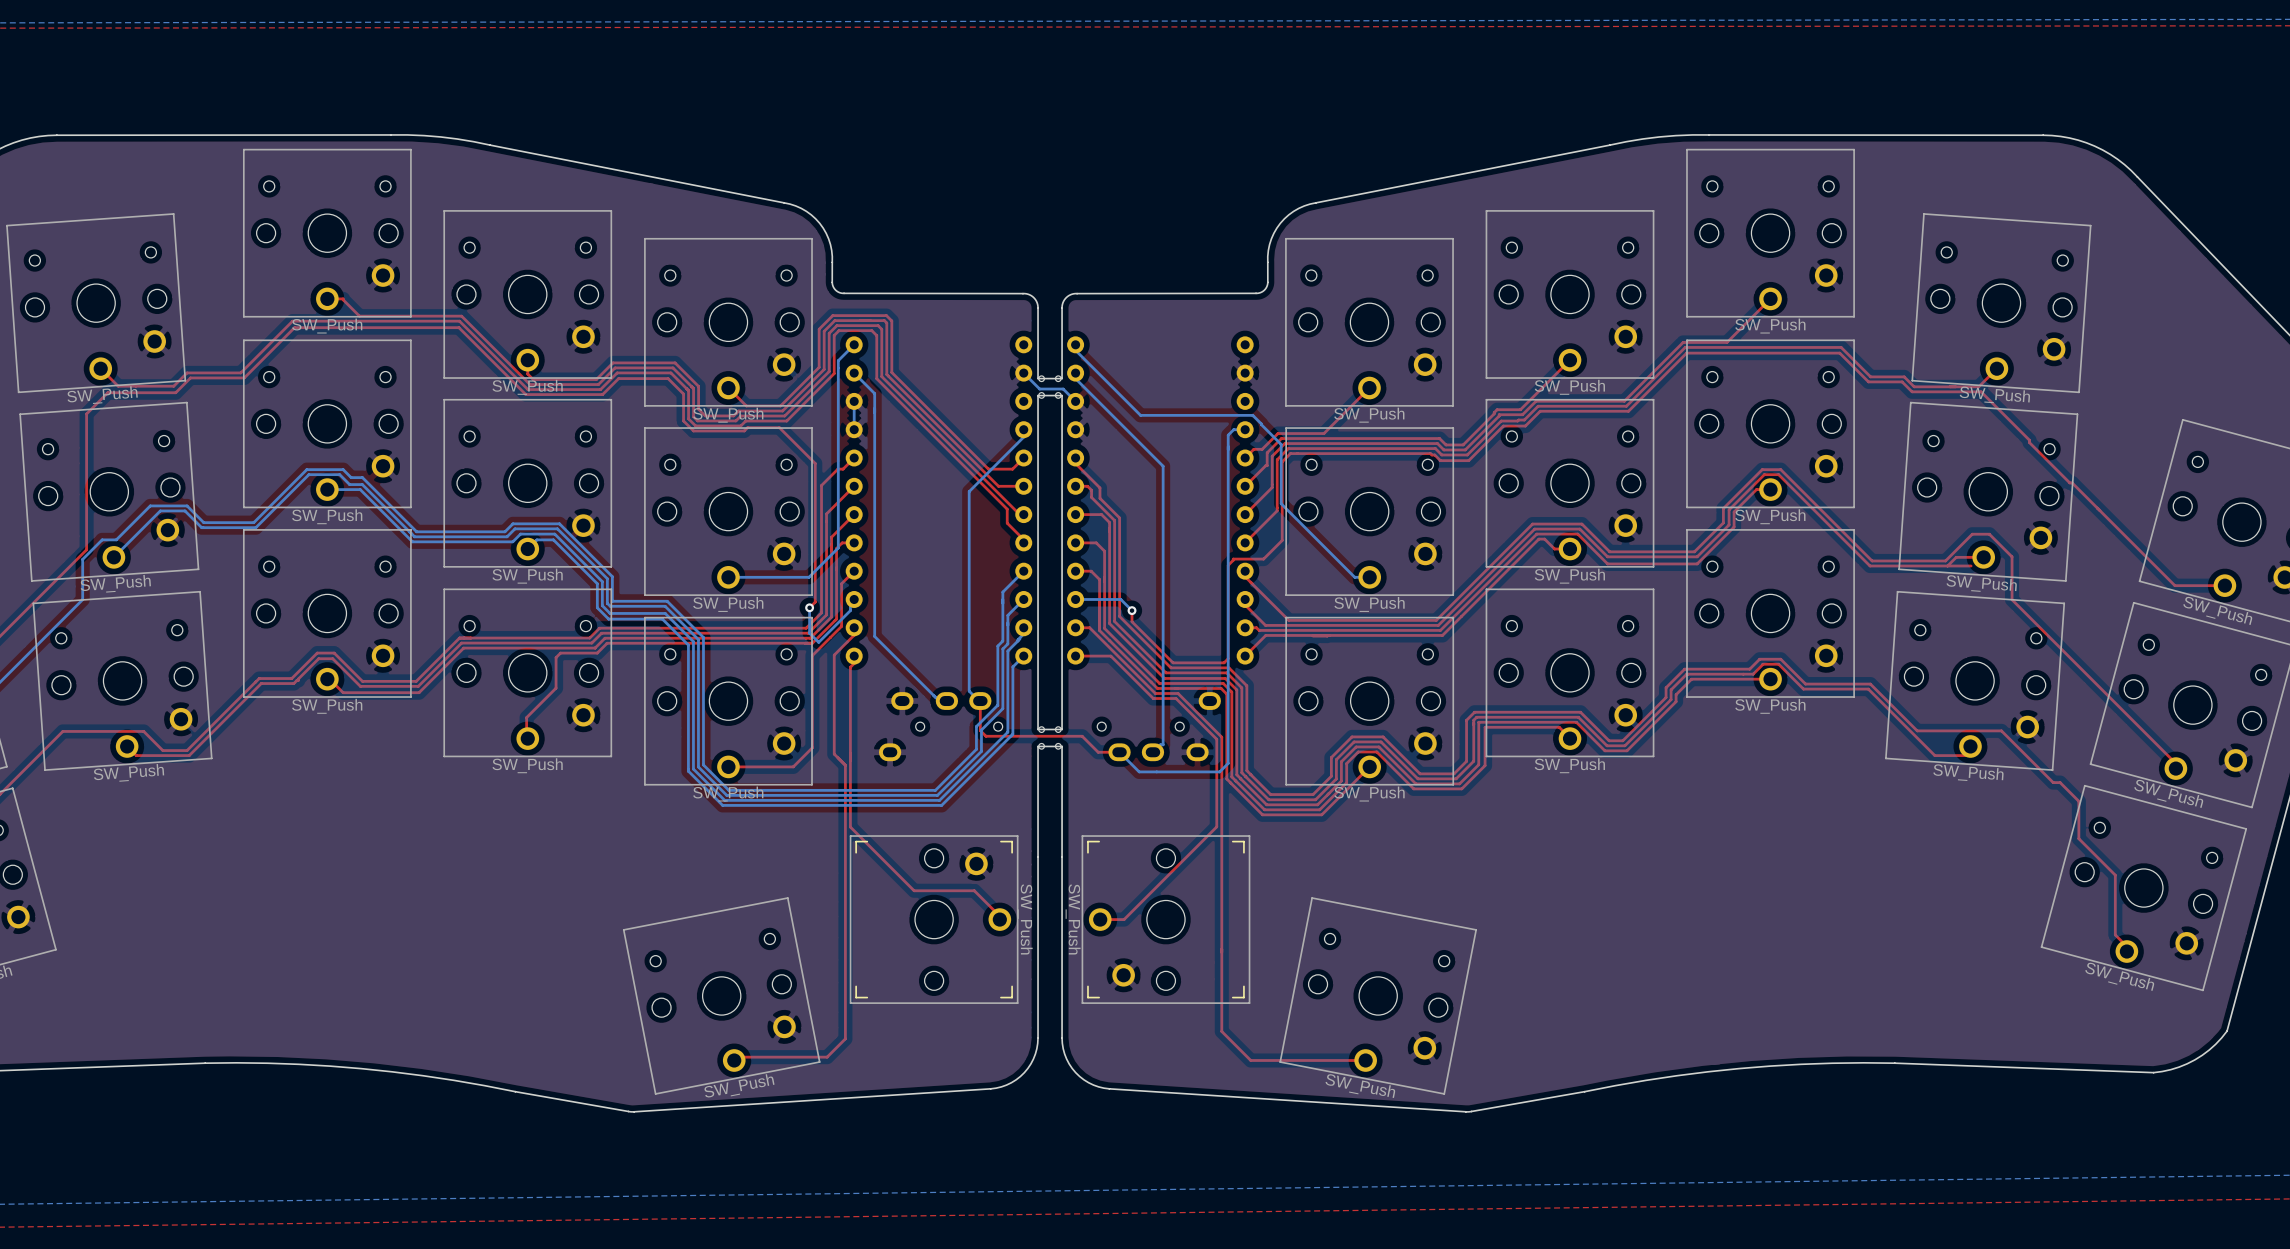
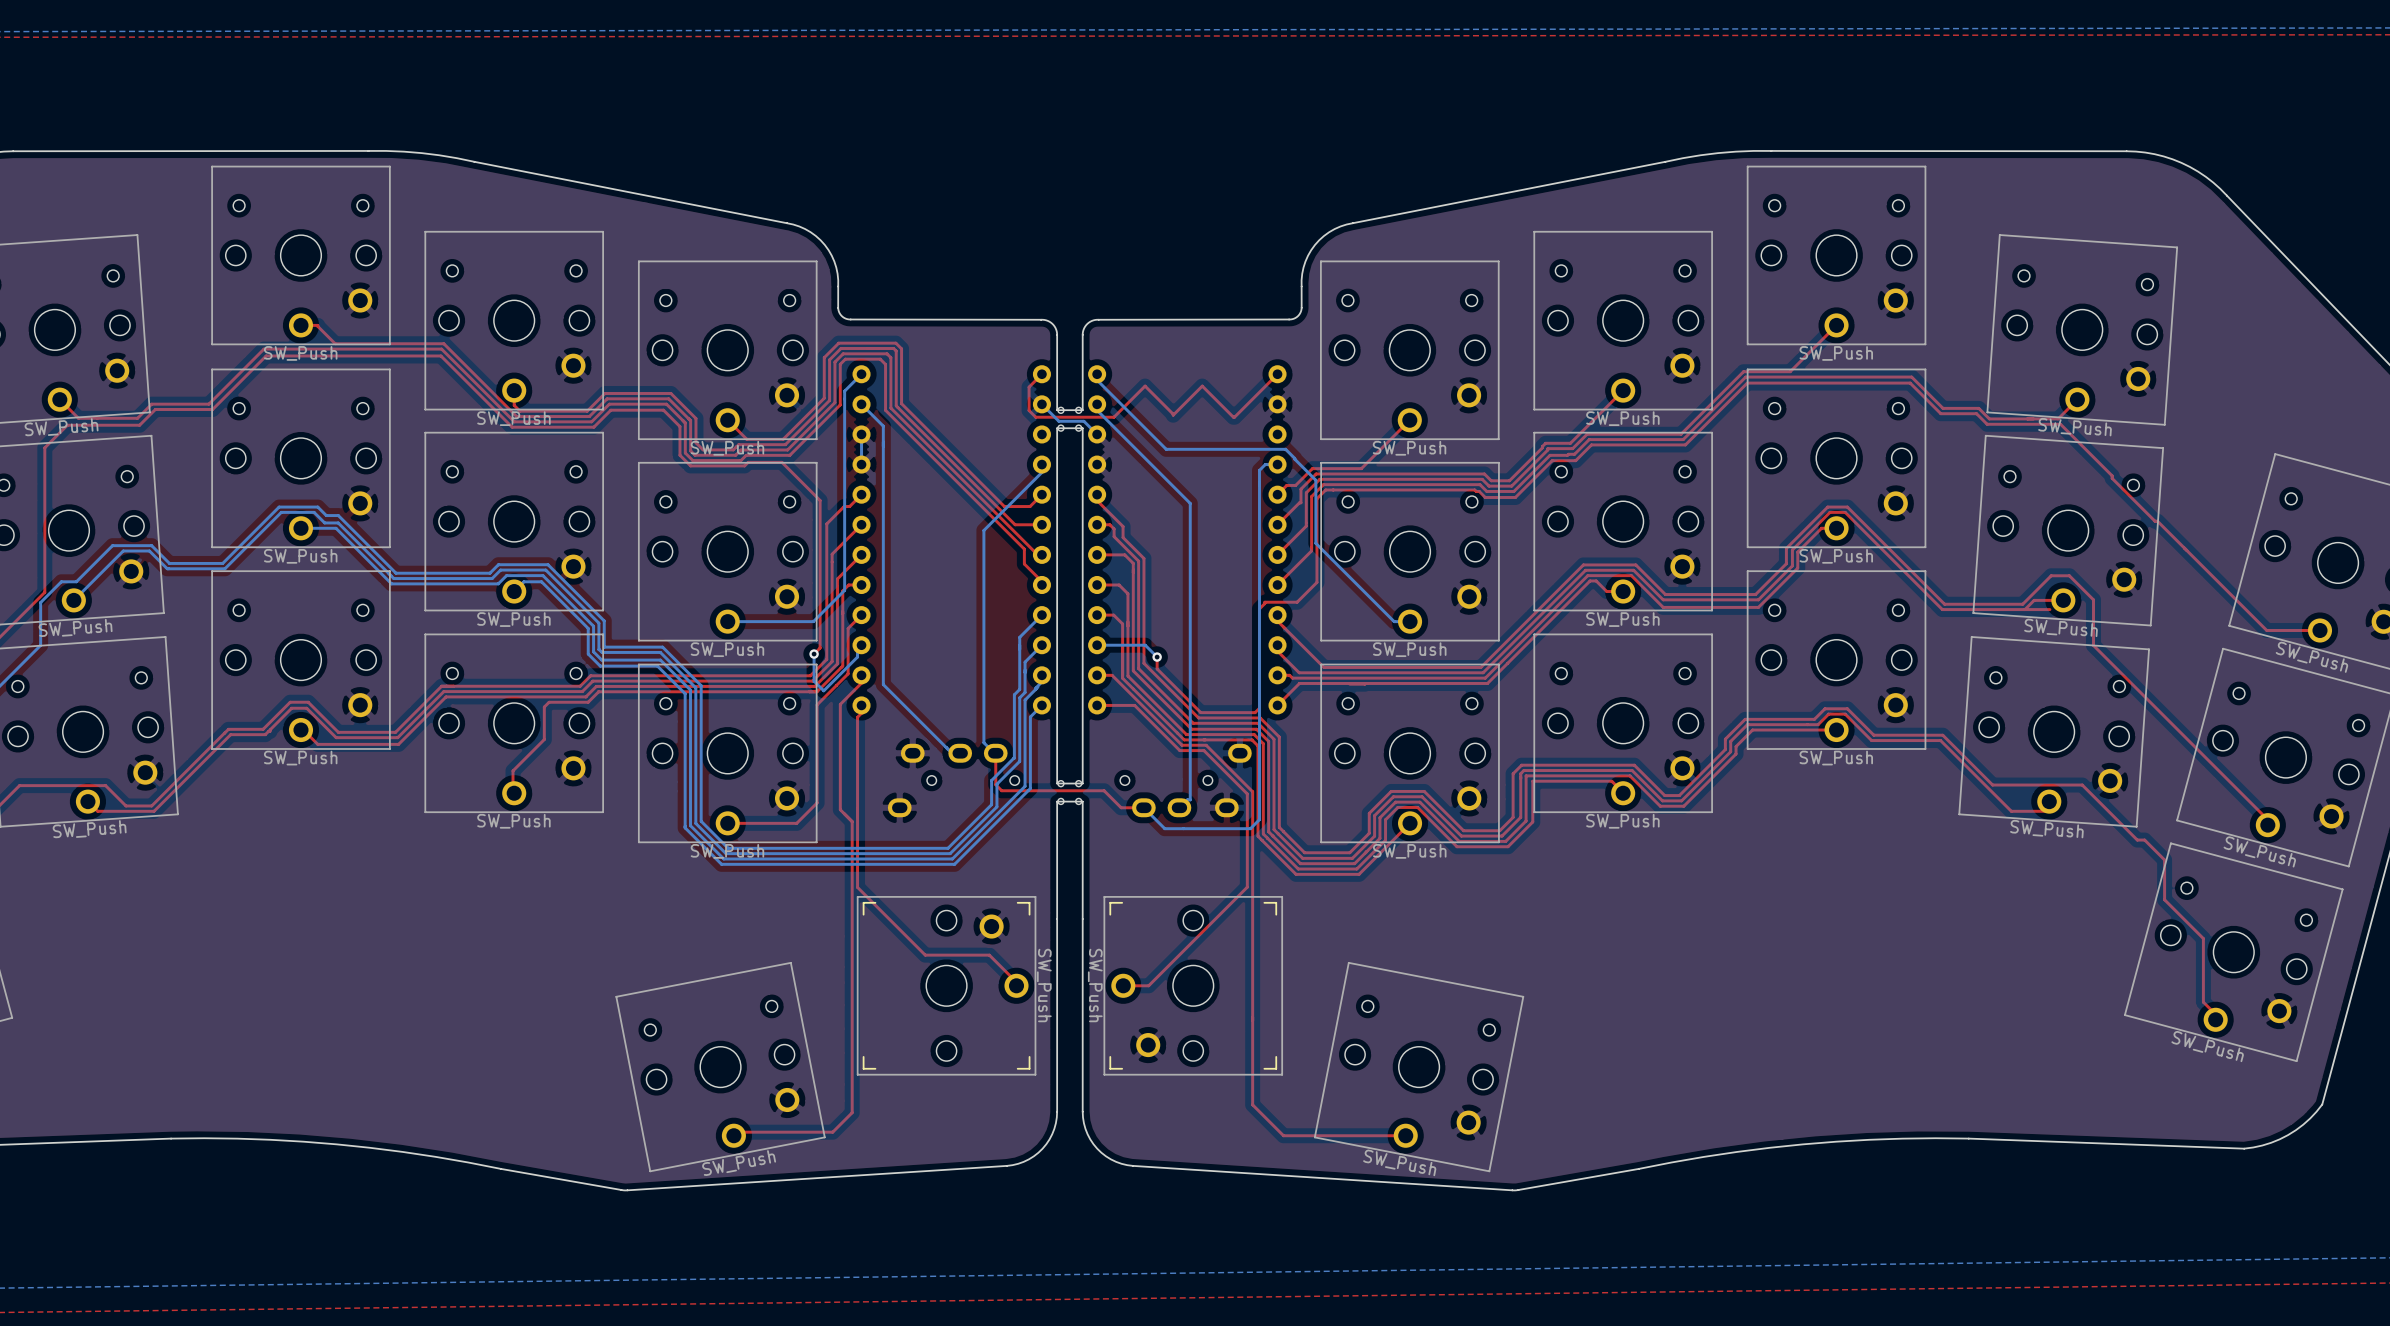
top track: none -> (1277, 374) (1234, 417) (1202, 386) (1173, 415) (1145, 386) (1113, 417) (1035, 417) (1029, 410) (1029, 387) (1041, 374)

